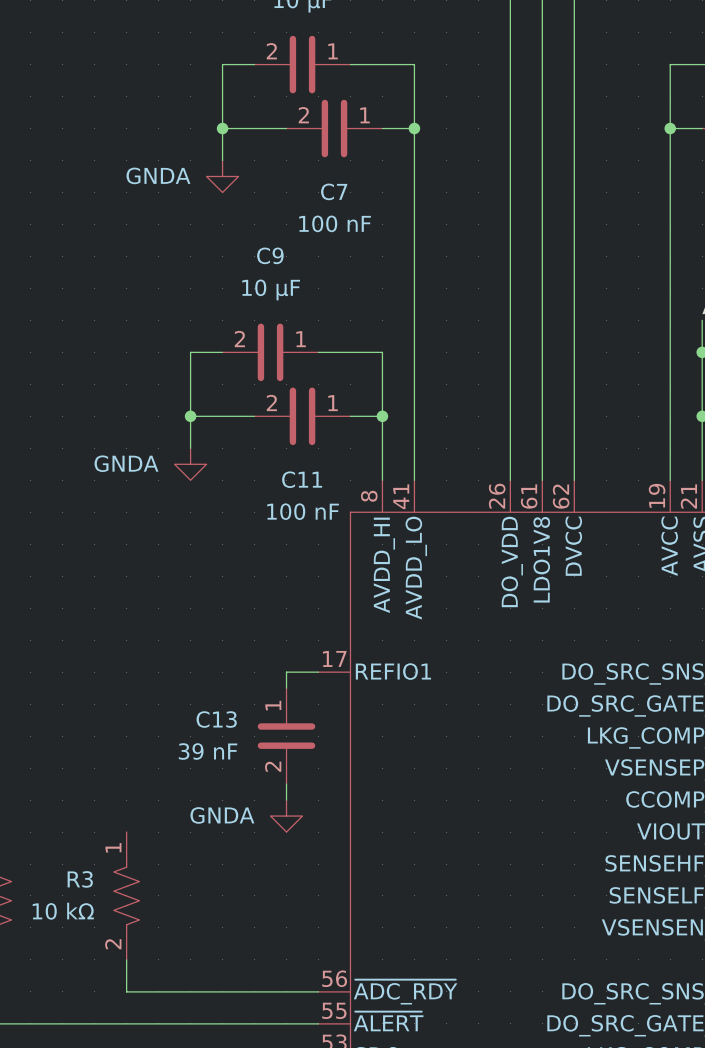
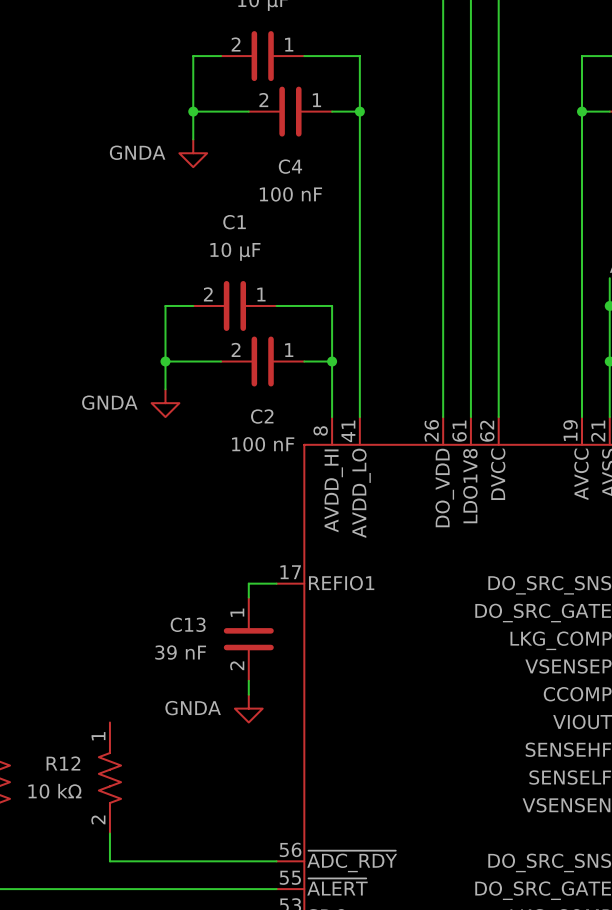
C7 name: C7 (334, 191) -> C4 (290, 166)
C9 name: C9 (270, 255) -> C1 (234, 222)
C11 name: C11 (302, 479) -> C2 (262, 416)
R3 name: R3 (80, 879) -> R12 (63, 763)

